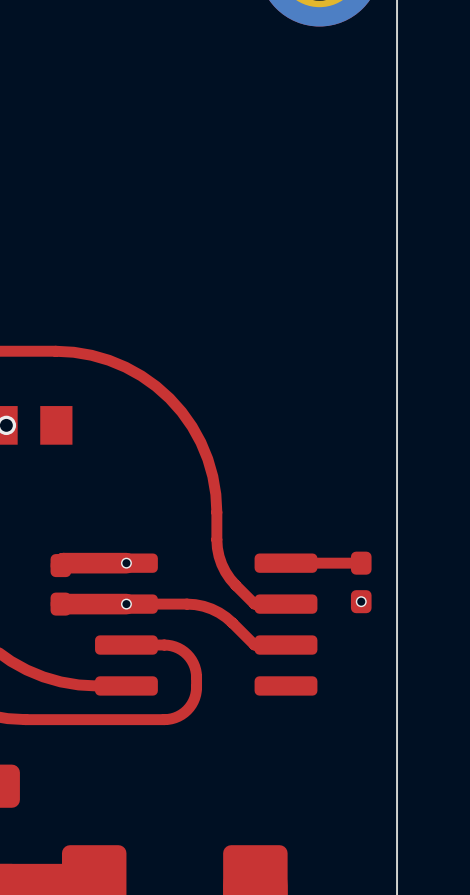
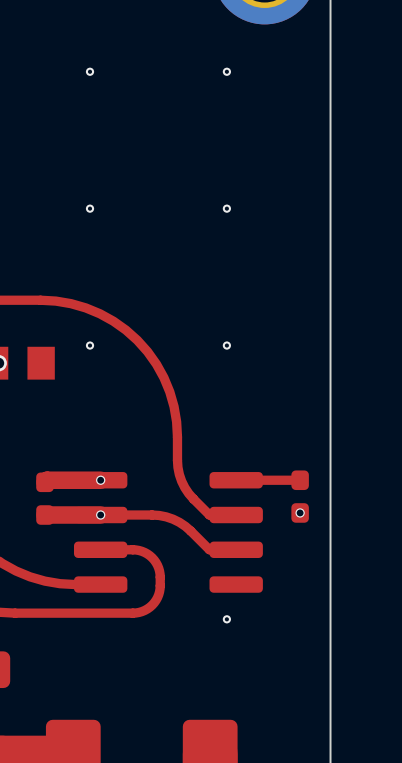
via: none -> (90, 71)
via: none -> (226, 71)
via: none -> (90, 208)
via: none -> (226, 208)
via: none -> (90, 345)
via: none -> (226, 345)
via: none -> (226, 619)

